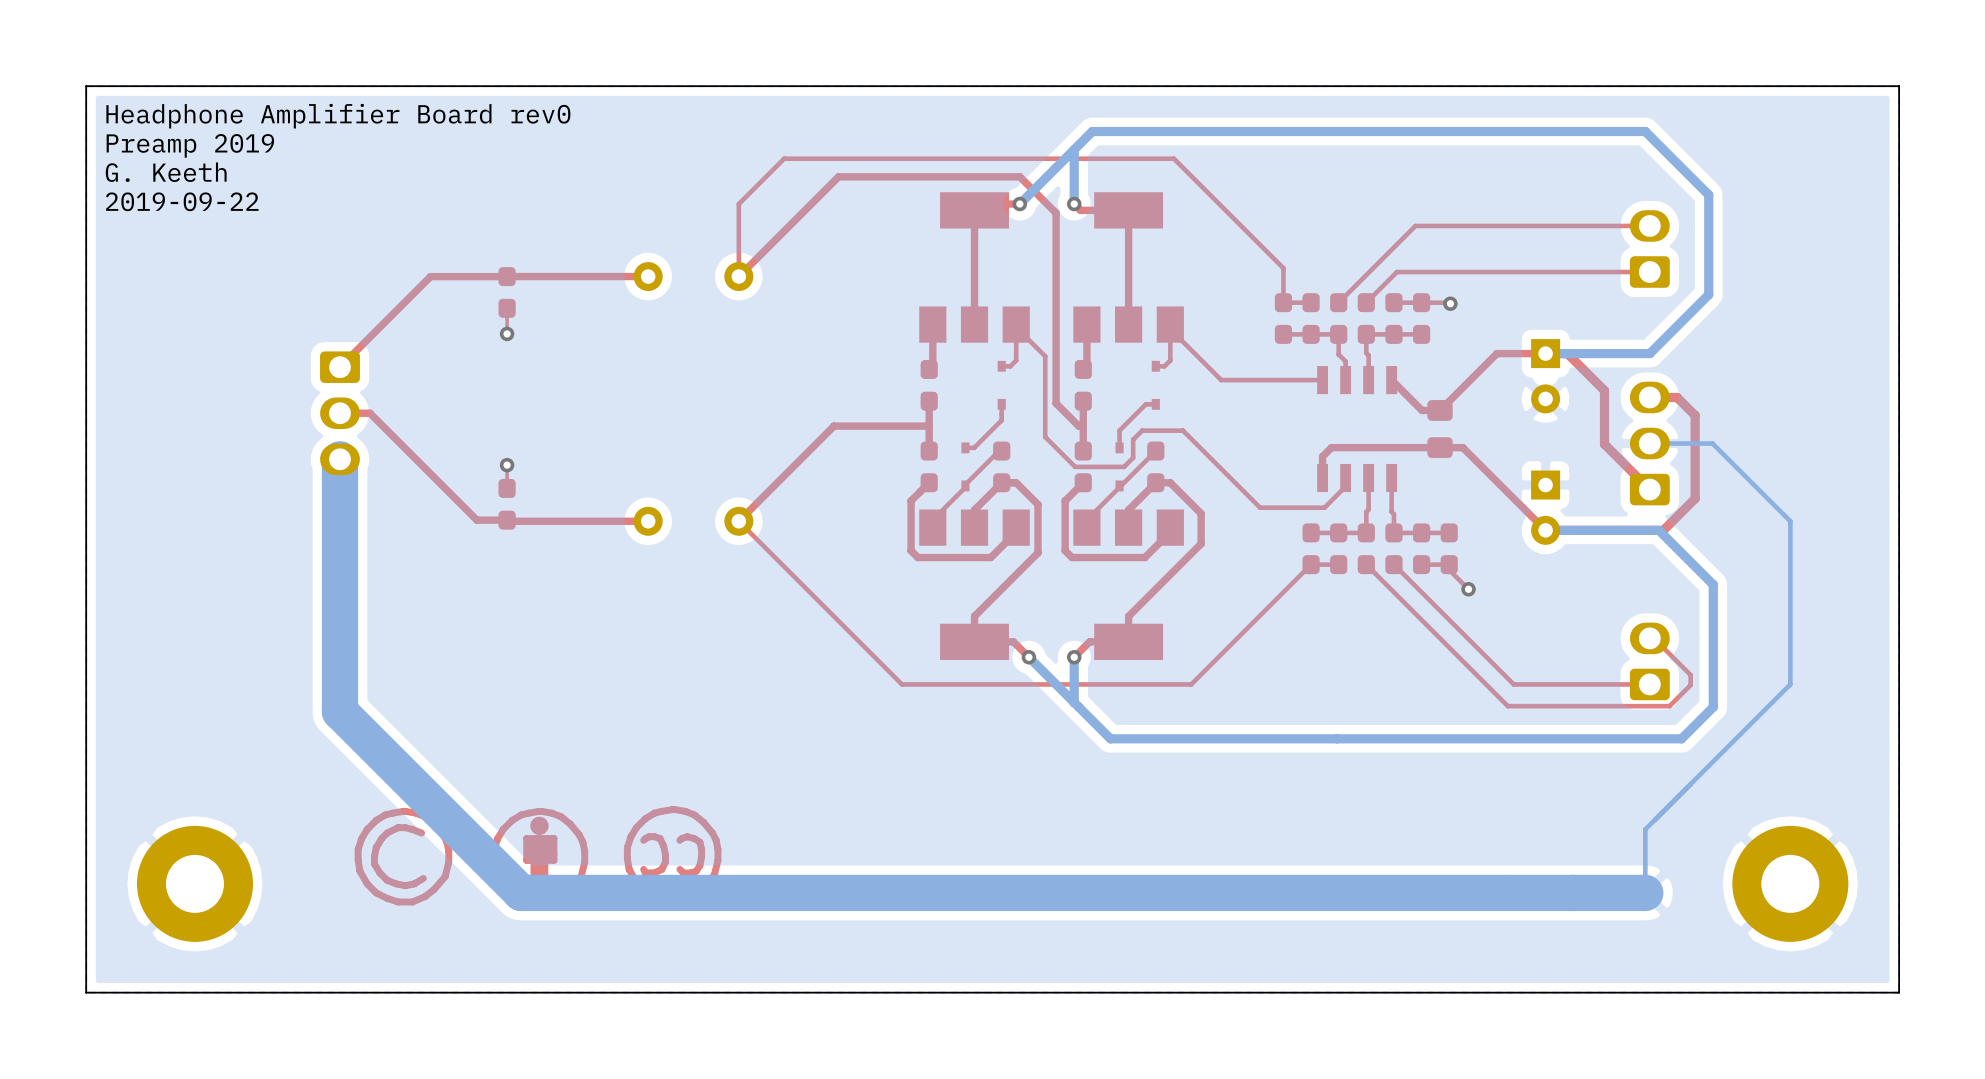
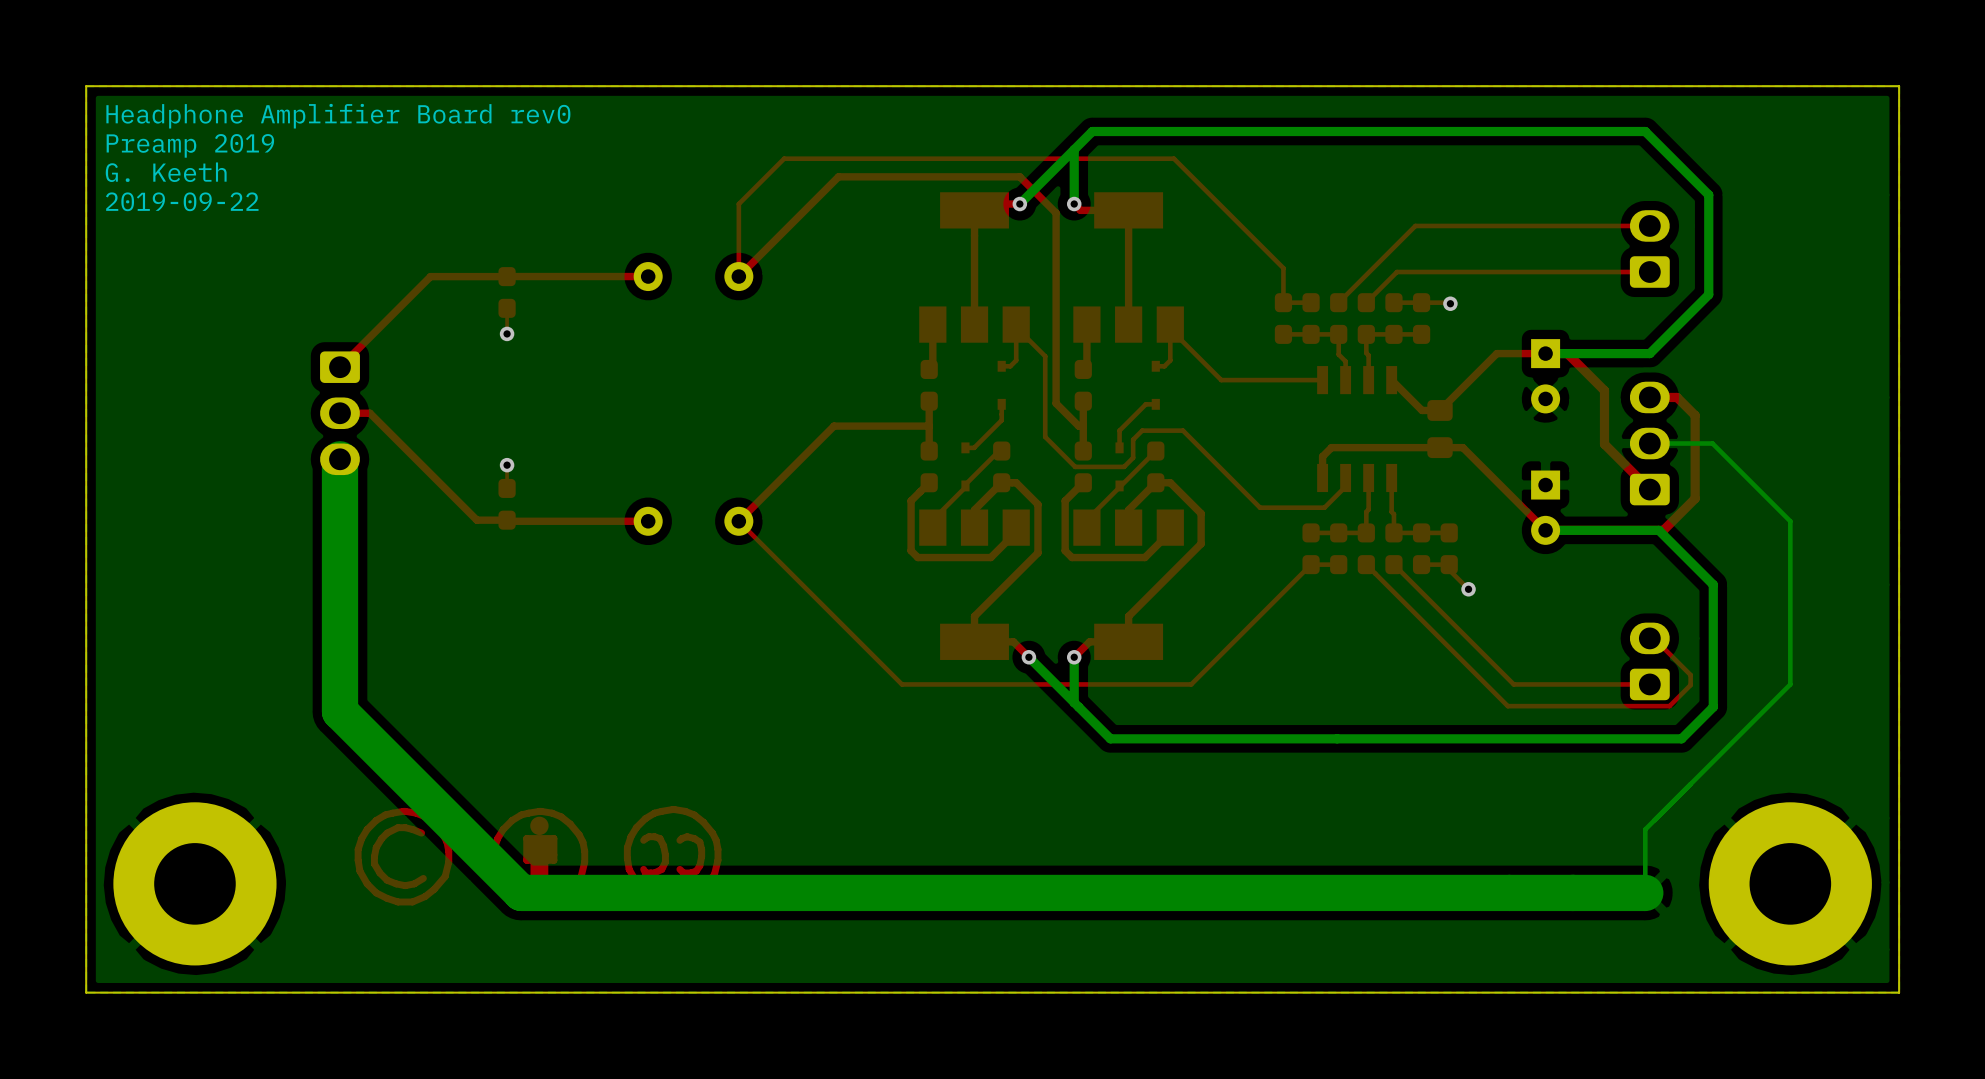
part footprint: [136, 825, 253, 942] -> [113, 802, 277, 966]
part footprint: [1732, 825, 1849, 942] -> [1708, 802, 1872, 966]

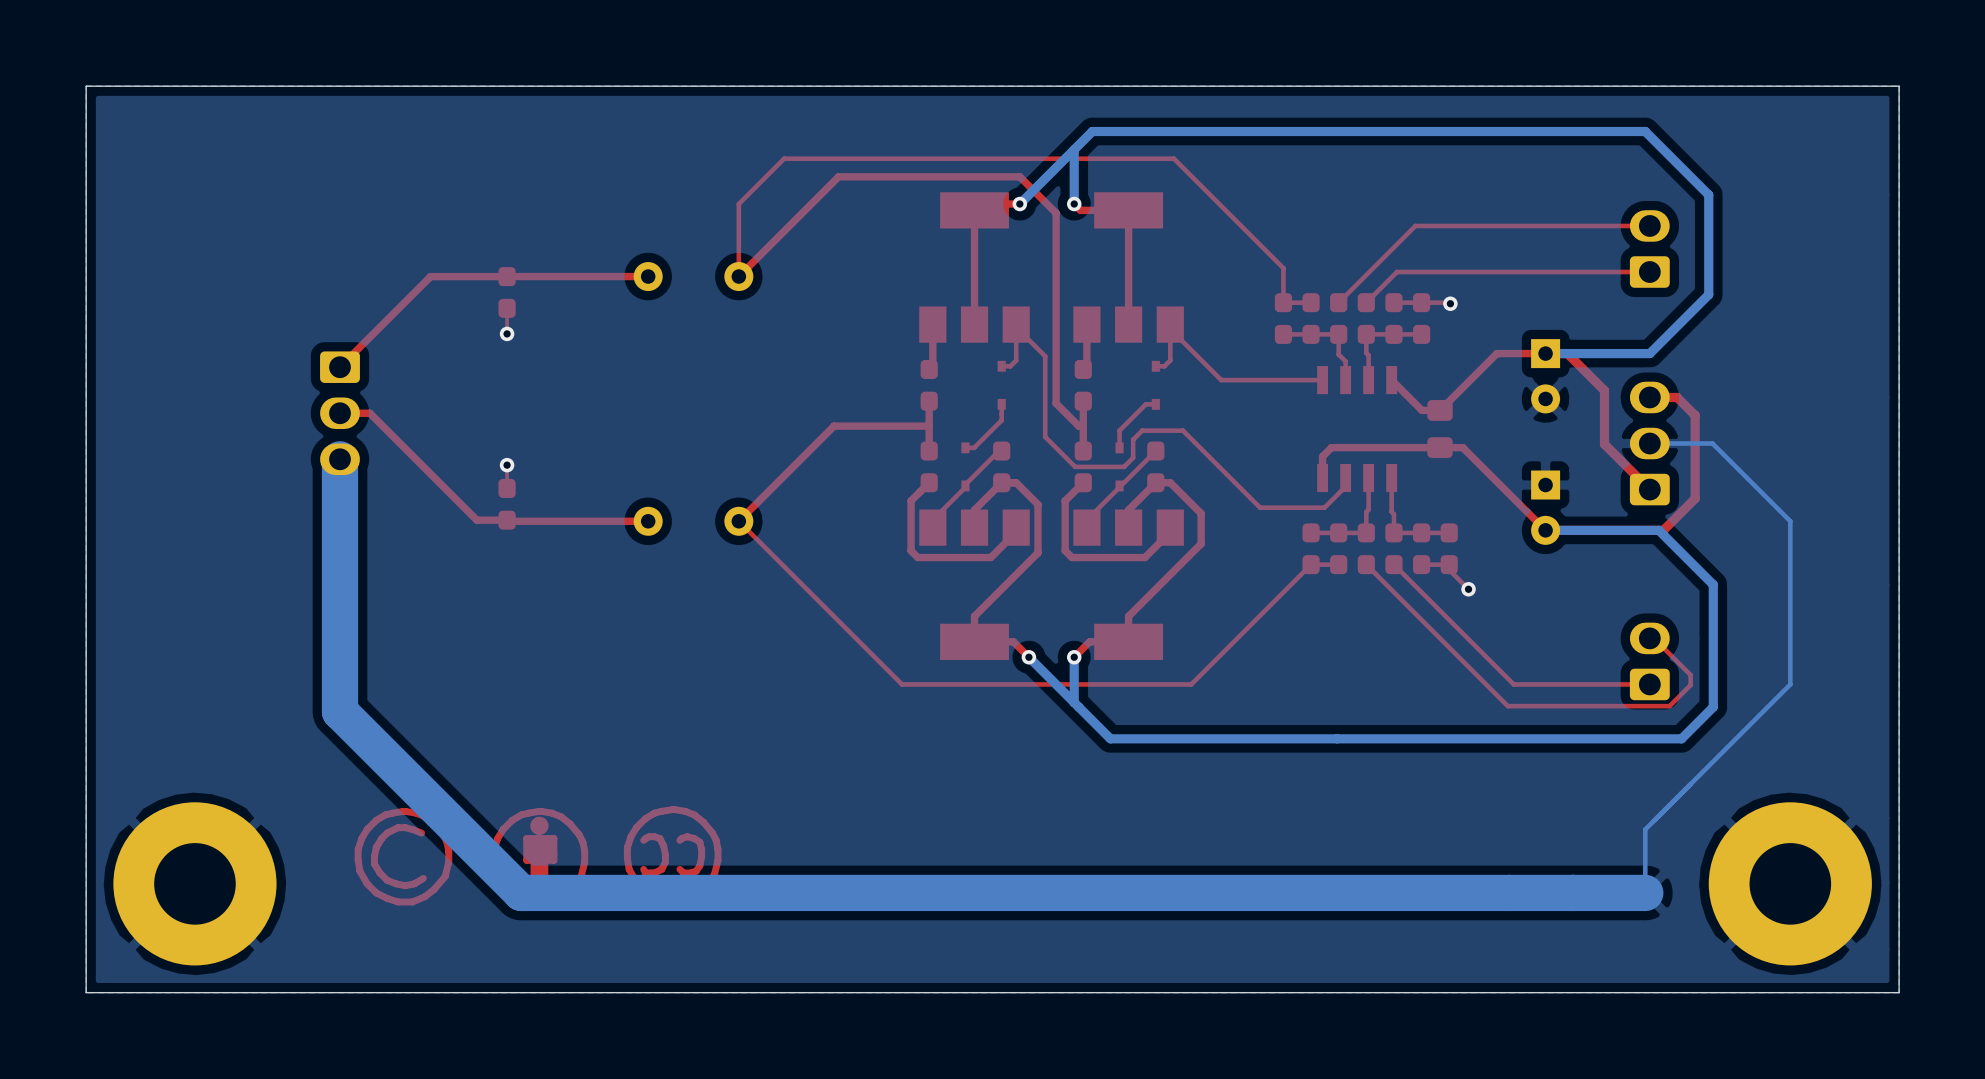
text: Headphone Amplifier Board rev0 (338, 116) -> none
text: Preamp 2019 (190, 145) -> none
text: G. Keeth (166, 172) -> none
text: 2019-09-22 (182, 201) -> none

